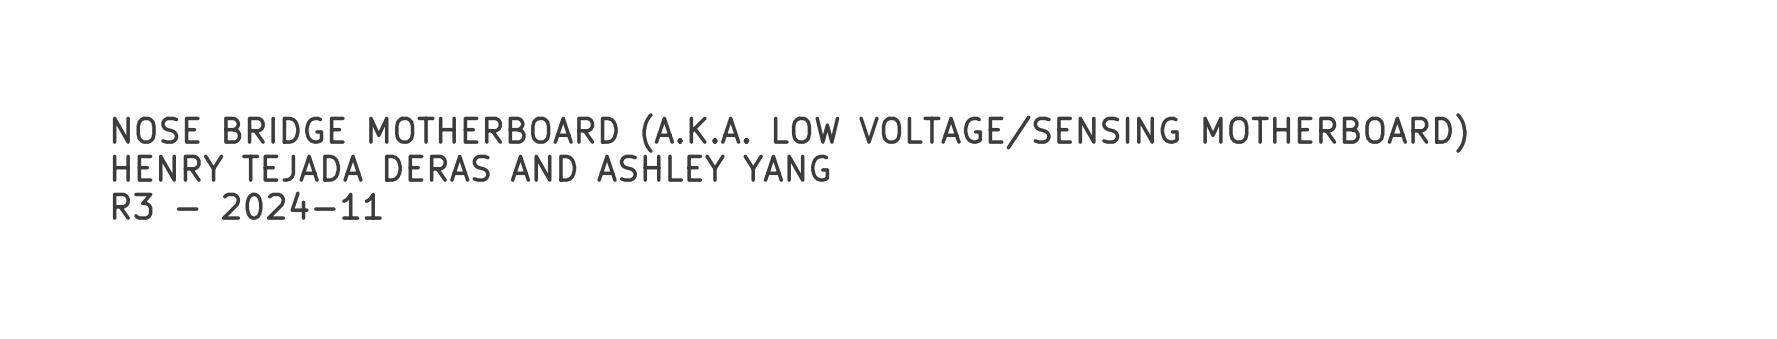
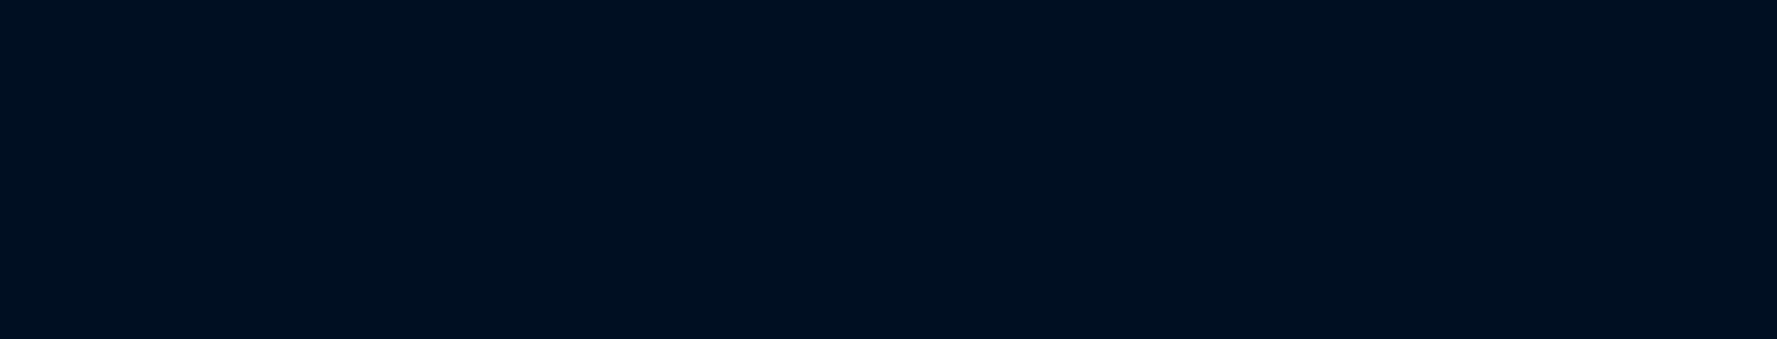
text: NOSE BRIDGE MOTHERBOARD (A.K.A. LOW VOLTAGE/SENSING MOTHERBOARD) (789, 133) -> none
text: HENRY TEJADA DERAS AND ASHLEY YANG (471, 168) -> none
text: R3 - 2024-11 (247, 205) -> none

